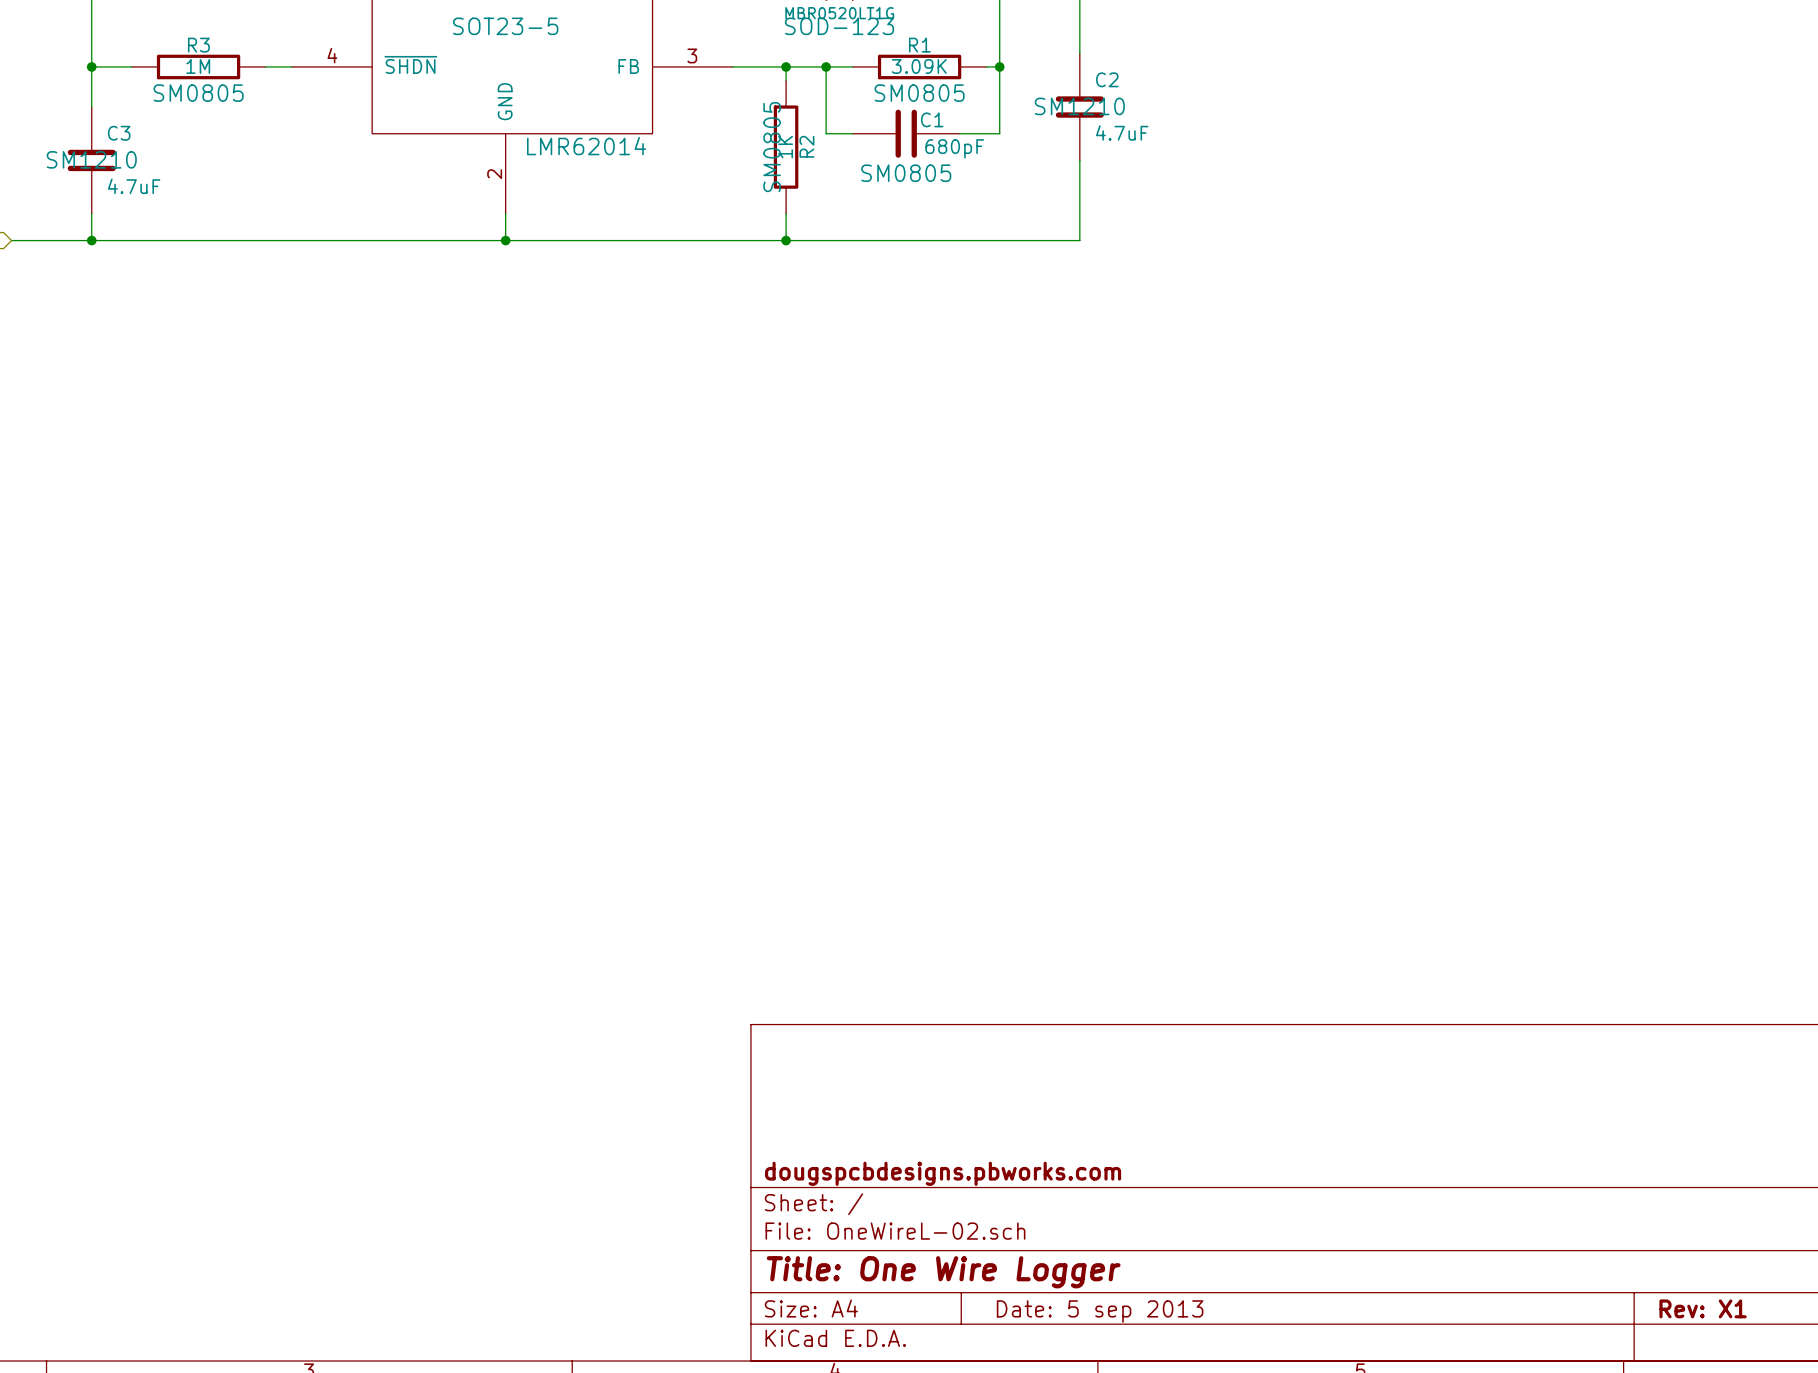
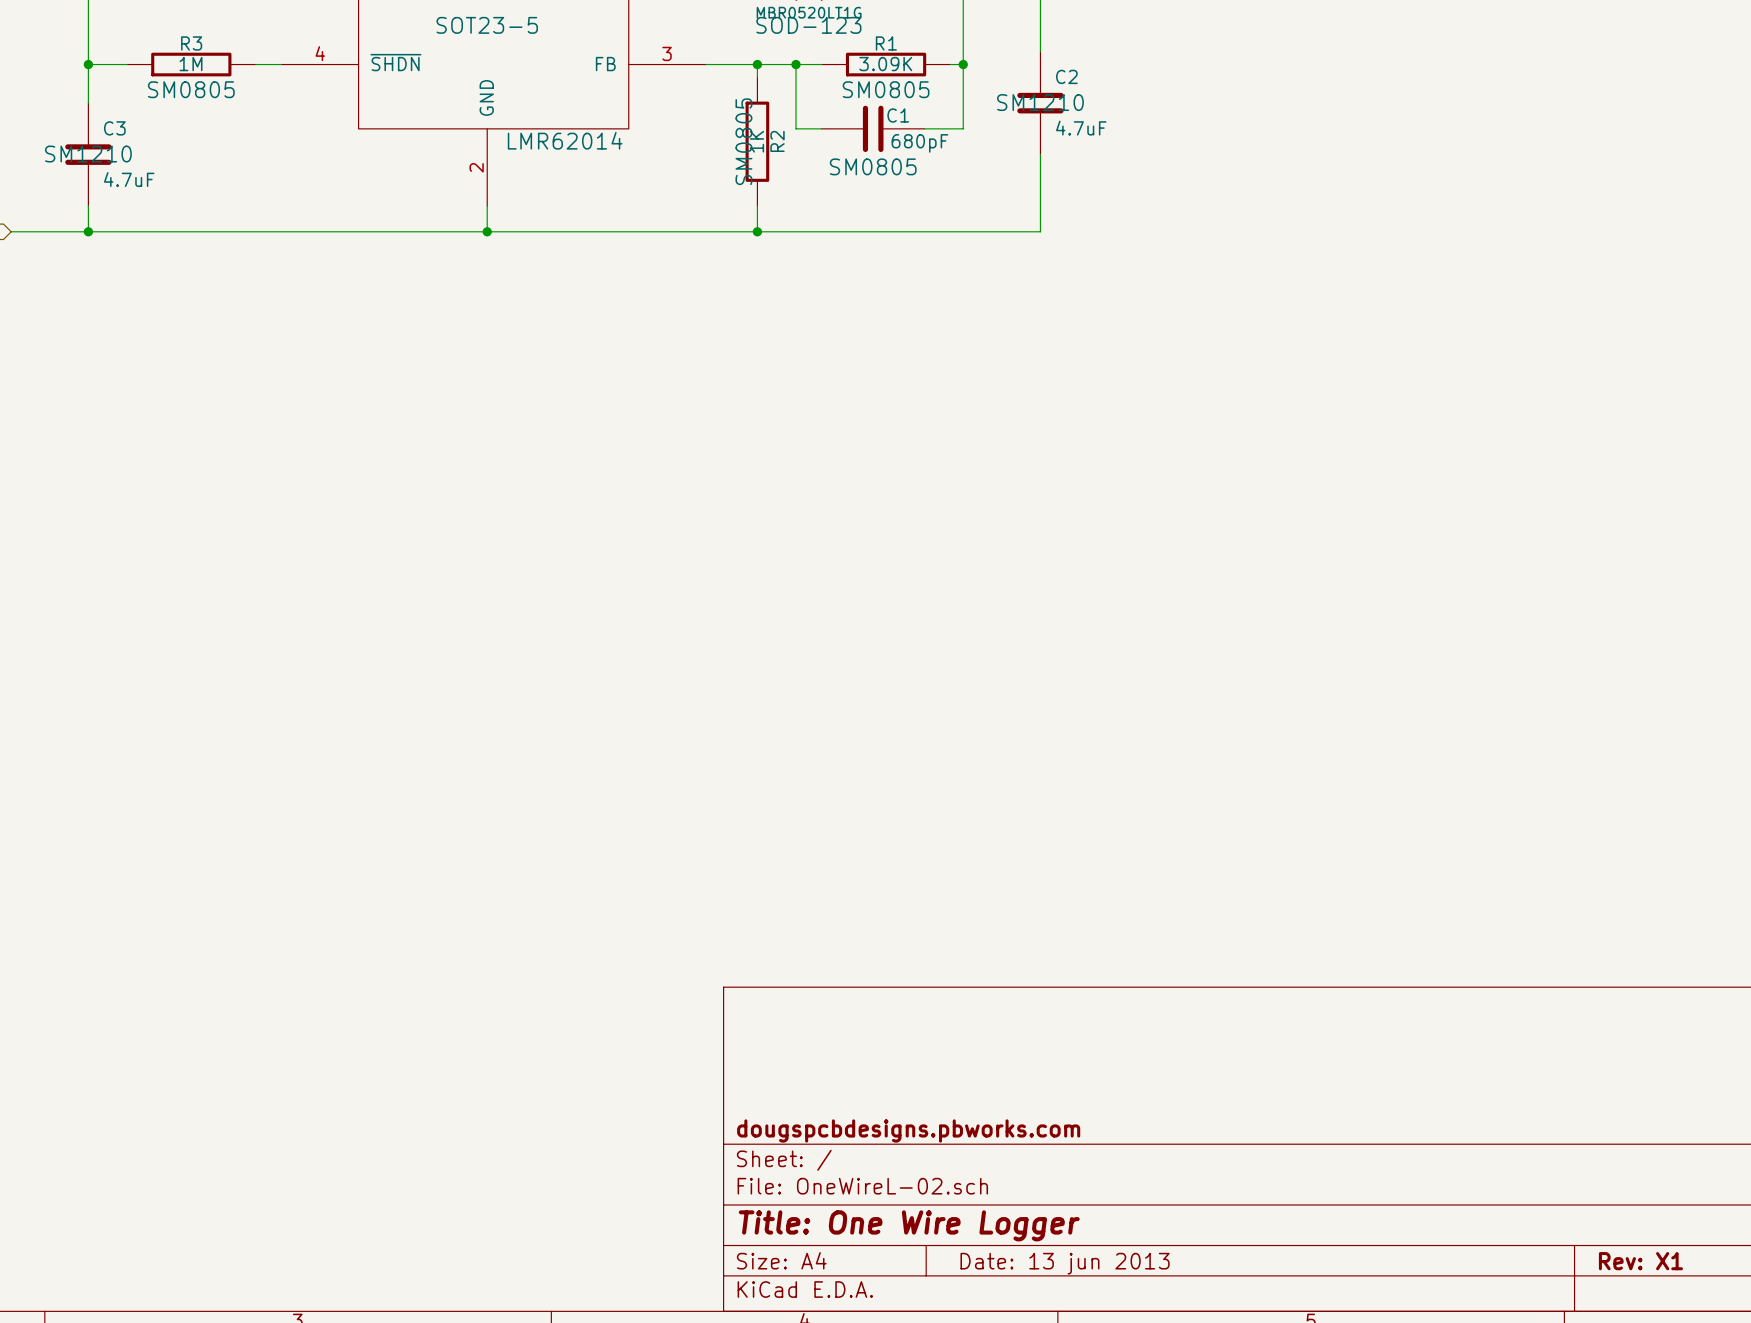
title block: Date: 5 sep 2013 (1100, 1311) -> Date: 13 jun 2013 (1065, 1263)

